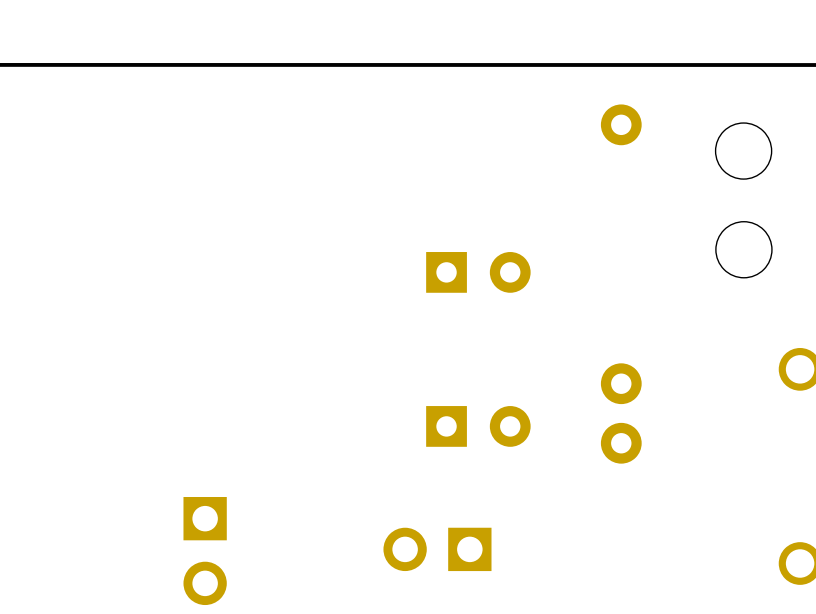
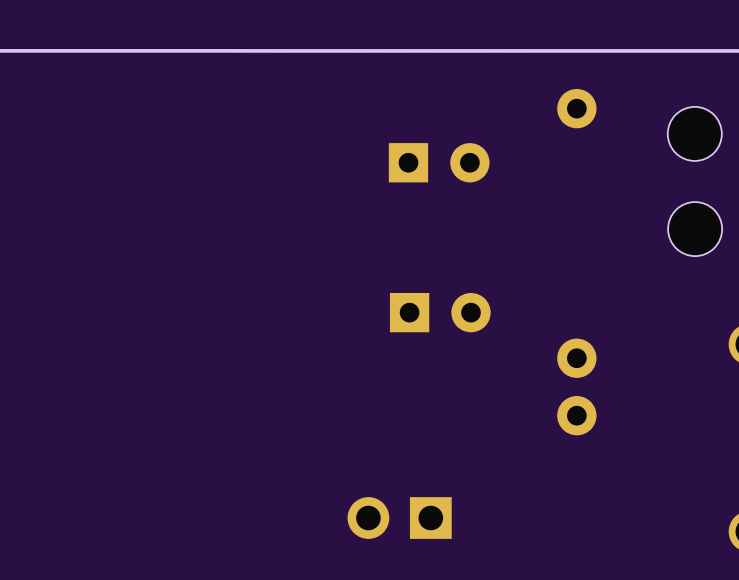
part: none -> (439, 162)
part: (478, 272) -> none
part: none -> (440, 312)
part: (478, 426) -> none
part: (205, 551) -> none

